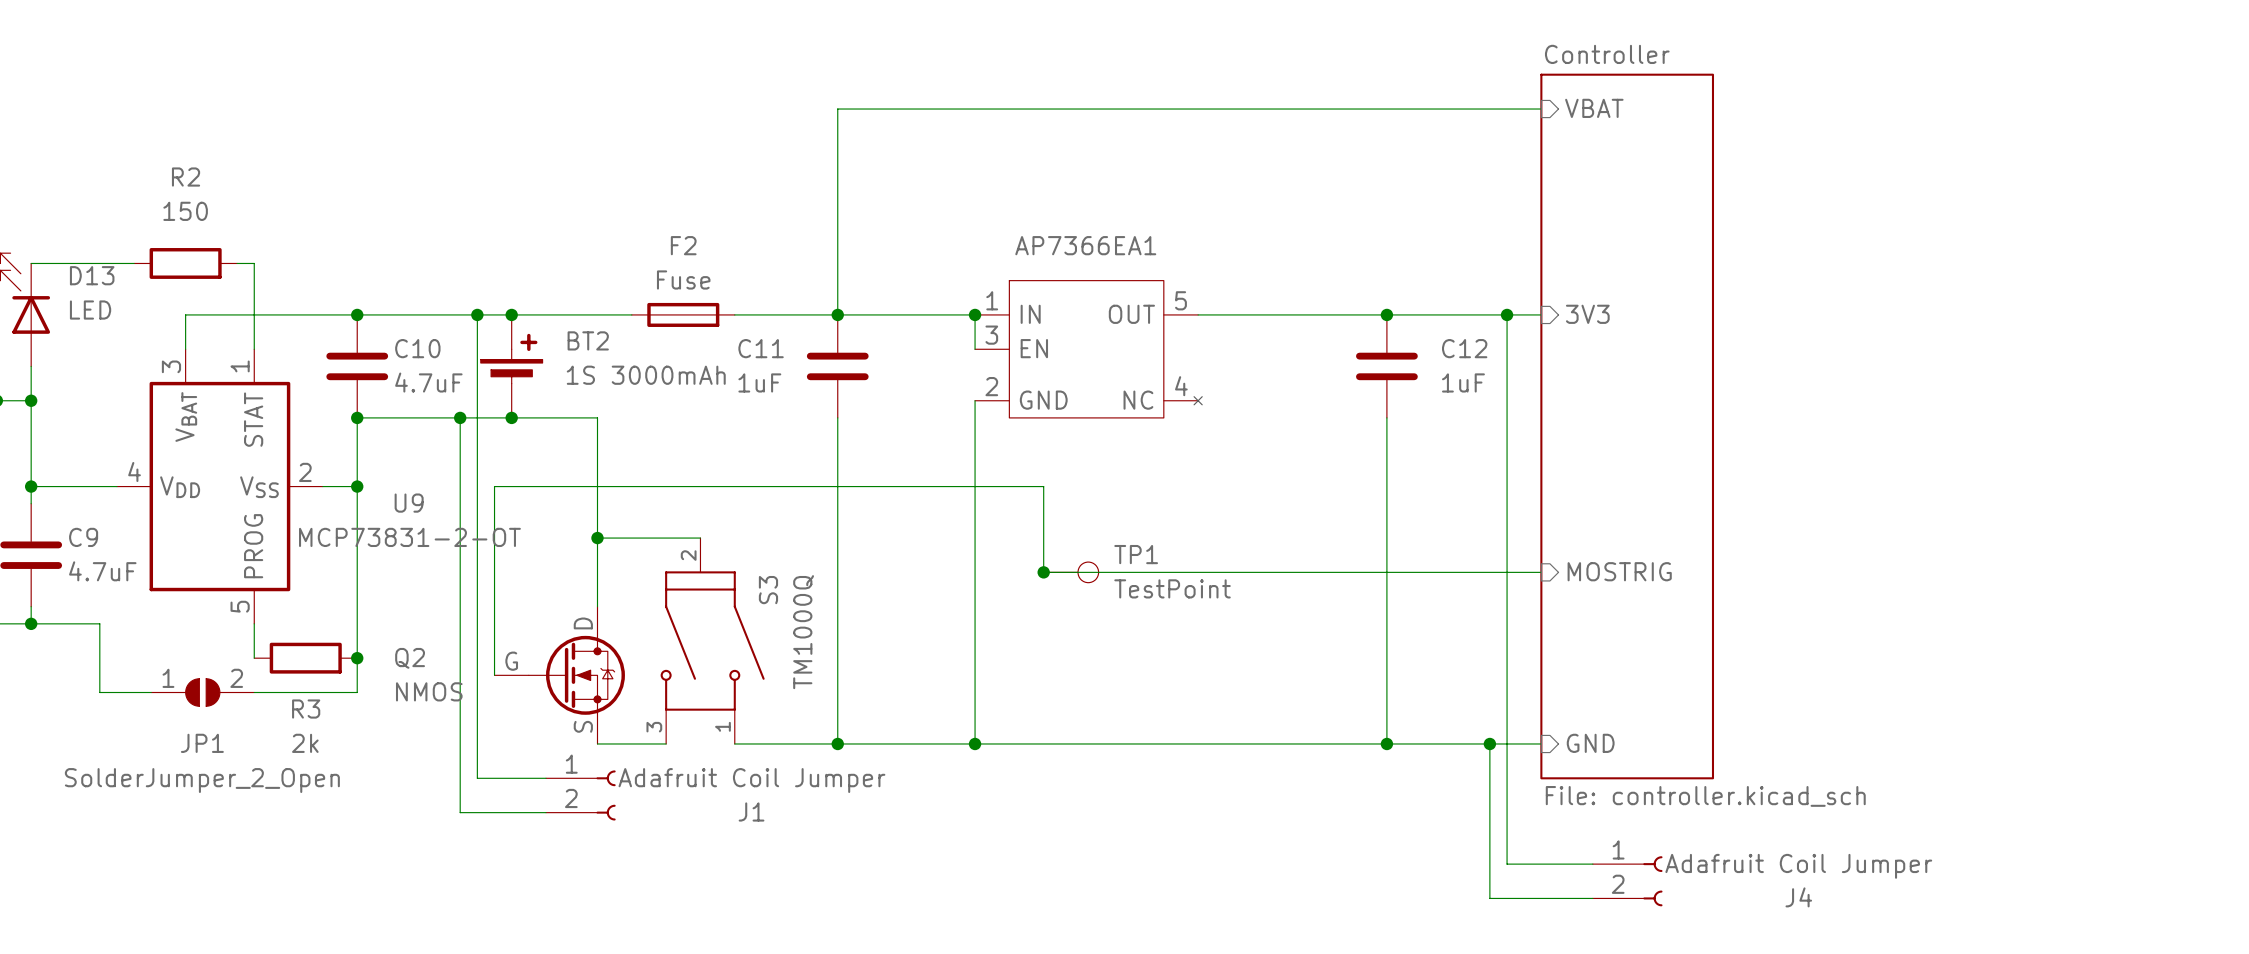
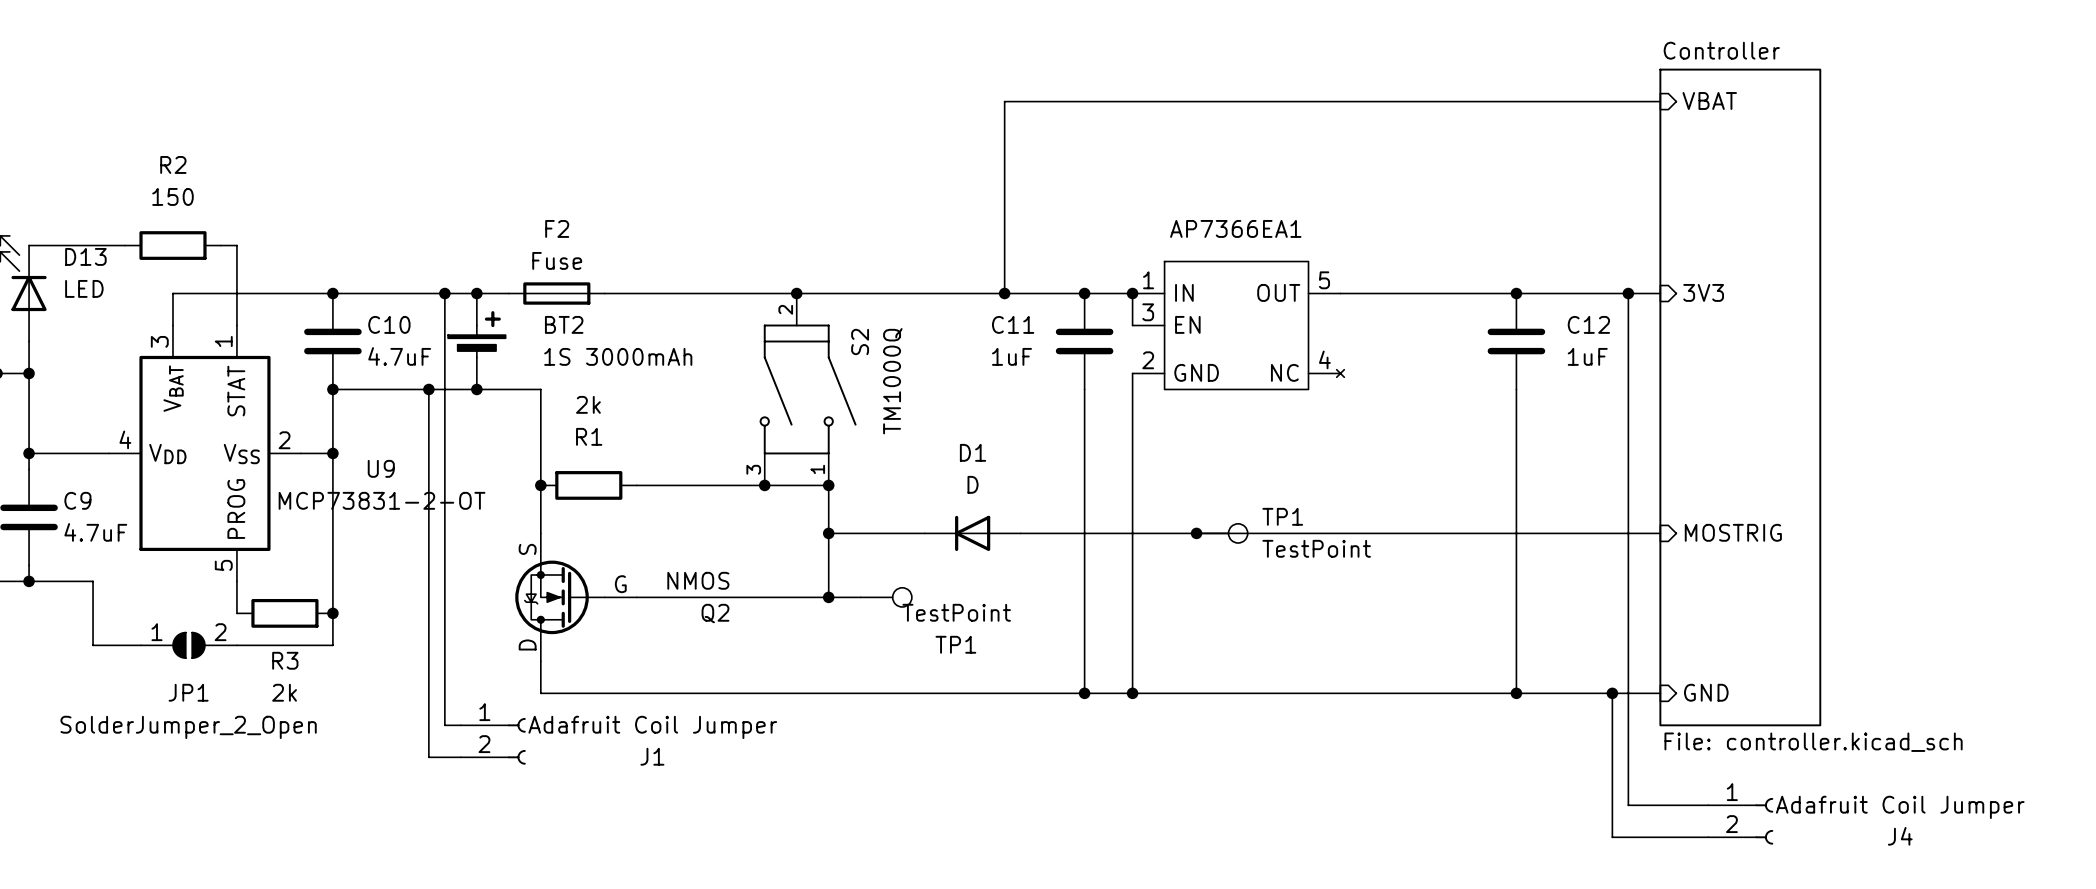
sheet pin position: VBAT (1594, 108) -> VBAT (1709, 100)
wire: (1078, 109) (837, 109) (837, 314) -> (1004, 101) (1004, 293)
wire: none -> (1436, 101) (1660, 101)
F2 position: (683, 314) -> (556, 293)
junction position: (837, 314) -> (796, 293)
wire: (975, 314) (975, 349) -> (908, 293) (1116, 293)
junction: (975, 314) -> none
junction: none -> (1004, 293)
junction: none -> (1084, 293)
wire: (1215, 314) (1438, 314) -> (1132, 293) (1132, 325)
junction: none -> (1132, 293)
junction: (1386, 314) -> none
wire: (1507, 314) (1507, 864) (1592, 864) -> (1628, 293) (1628, 805) (1708, 805)
junction: (1507, 314) -> none
wire: none -> (1436, 293) (1660, 293)
sheet pin position: 3V3 (1587, 314) -> 3V3 (1703, 292)
junction: none -> (1516, 293)
junction: none -> (1628, 293)
BT2 name position: BT2 (588, 340) -> BT2 (564, 324)
AP7366EA1 position: (1088, 349) -> (1238, 325)
C11 position: (837, 366) -> (1084, 341)
C12 position: (1386, 366) -> (1516, 341)
BT2 value position: 1S 3000mAh (646, 375) -> 1S 3000mAh (618, 356)
wire: (975, 400) (975, 743) -> (1132, 373) (1132, 693)
wire: (580, 417) (597, 417) (597, 606) -> (540, 389) (540, 533)
wire: (837, 417) (837, 743) -> (1084, 389) (1084, 693)
S2: none -> TM1000Q (808, 389)
wire: (1386, 417) (1386, 743) -> (1516, 389) (1516, 693)
sheet Controller position: (1627, 426) -> (1740, 397)
R1: none -> 2k (588, 485)
wire: none -> (636, 485) (828, 485) (828, 597)
junction: none -> (764, 485)
junction: none -> (828, 485)
wire: (597, 538) (700, 538) -> (828, 533) (924, 533)
junction position: (597, 538) -> (540, 485)
sheet pin position: MOSTRIG (1619, 571) -> MOSTRIG (1733, 532)
junction: none -> (828, 533)
junction: (1043, 572) -> none
D1: none -> D (972, 533)
TP1: TestPoint (1071, 572) -> none
wire: (1095, 572) (1043, 572) (1043, 486) (494, 486) (494, 675) -> none
junction: none -> (1196, 533)
TP1: none -> TestPoint (1222, 533)
wire: none -> (1436, 533) (1660, 533)
wire: none -> (636, 597) (860, 597)
S3: TM1000Q (712, 641) -> none
junction: none -> (828, 597)
TP1: none -> TestPoint (886, 597)
Q2 rotation: 0° (576, 675) -> 180° (560, 597)
wire: none -> (540, 661) (540, 693) (556, 693)
wire: none -> (620, 693) (684, 693)
junction: (837, 743) -> none
junction: (975, 743) -> none
junction: none -> (1084, 693)
junction: none -> (1132, 693)
junction: (1386, 743) -> none
wire: (1489, 743) (1489, 898) (1592, 898) -> (1612, 693) (1612, 837) (1708, 837)
junction: (1489, 743) -> none
wire: none -> (1436, 693) (1660, 693)
sheet pin position: GND (1590, 743) -> GND (1706, 692)
junction: none -> (1516, 693)
junction: none -> (1612, 693)
J1 position: (580, 795) -> (493, 741)
J4 position: (1627, 881) -> (1740, 821)

